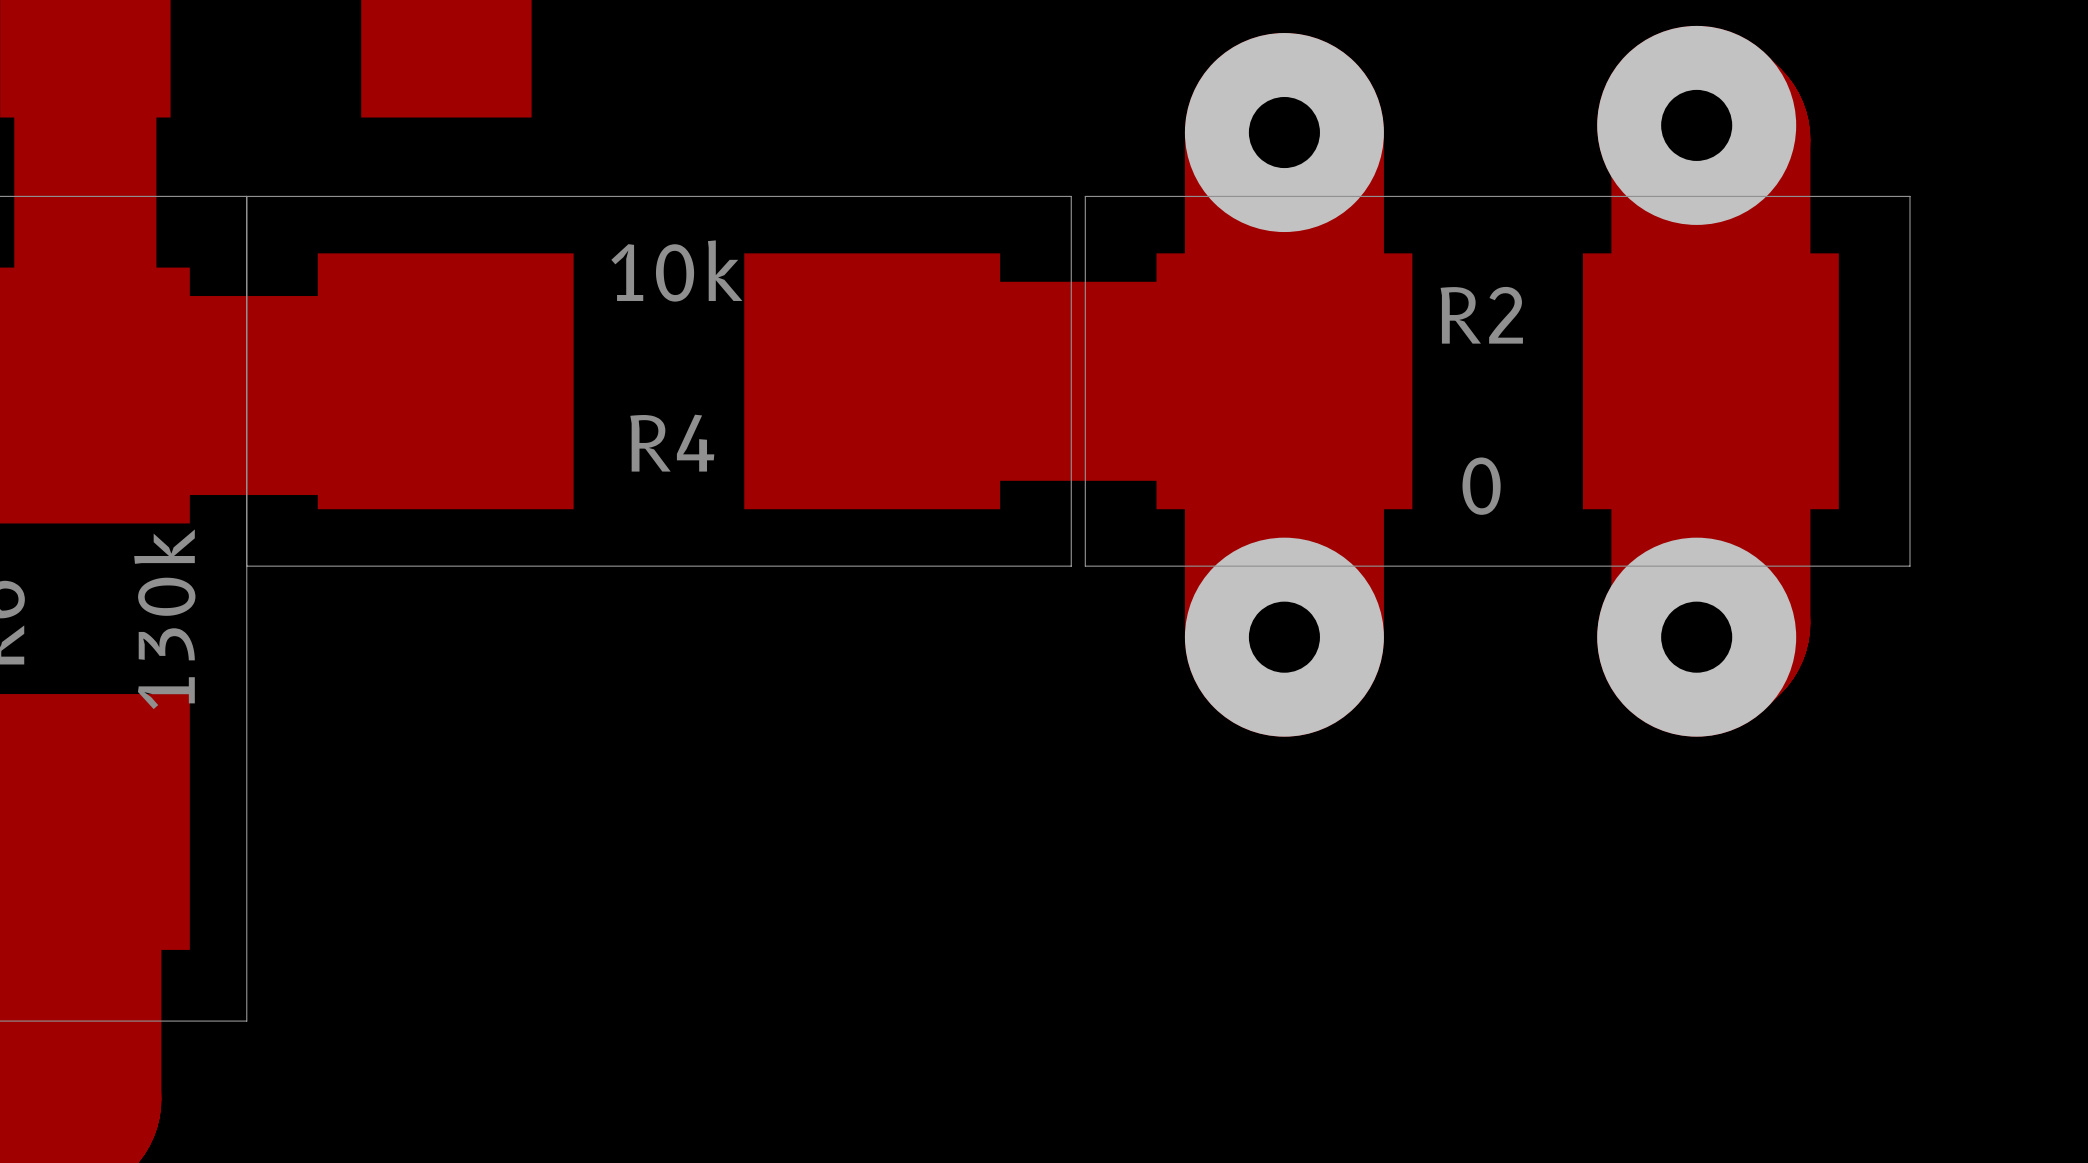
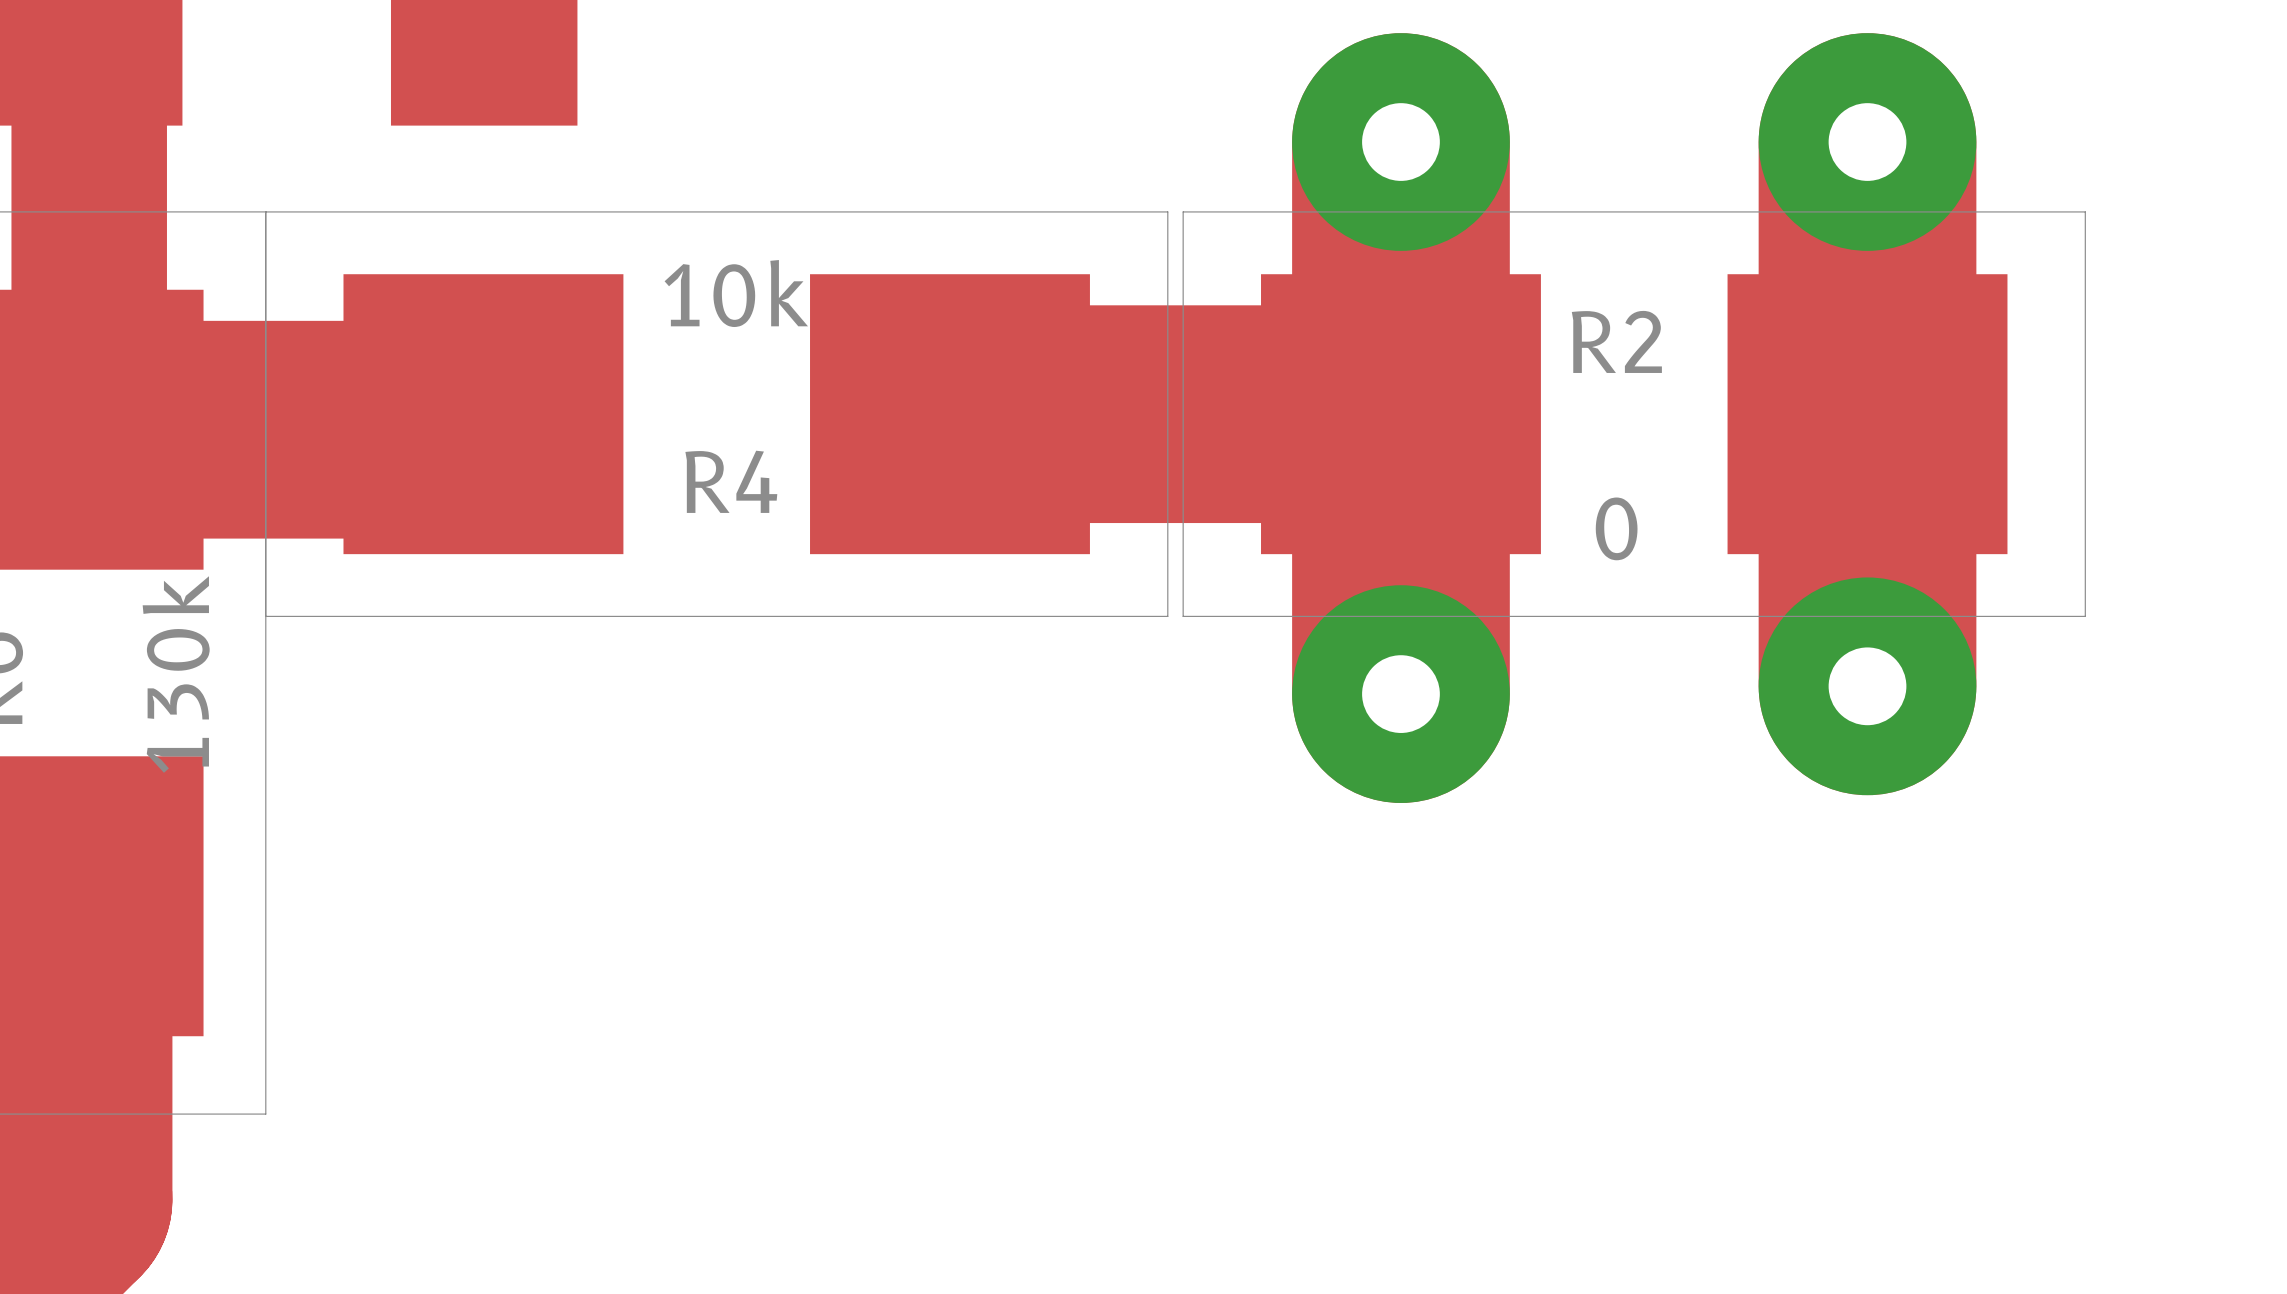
via position: (1696, 125) -> (1867, 142)
via position: (1696, 637) -> (1867, 686)

